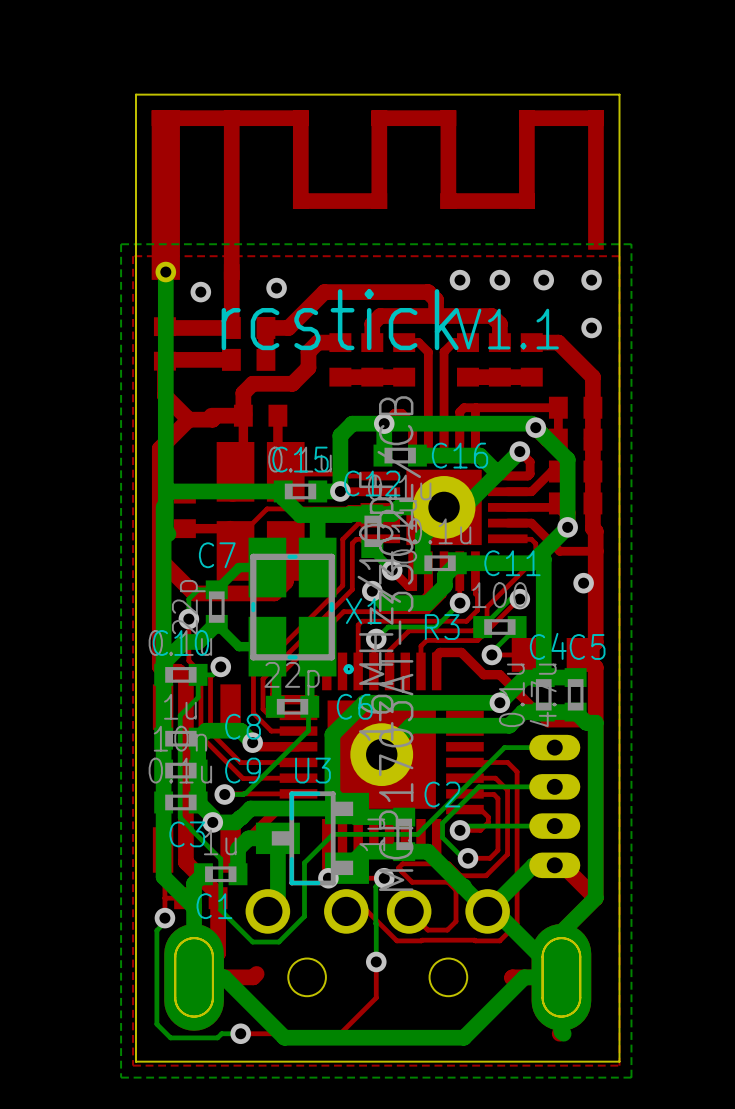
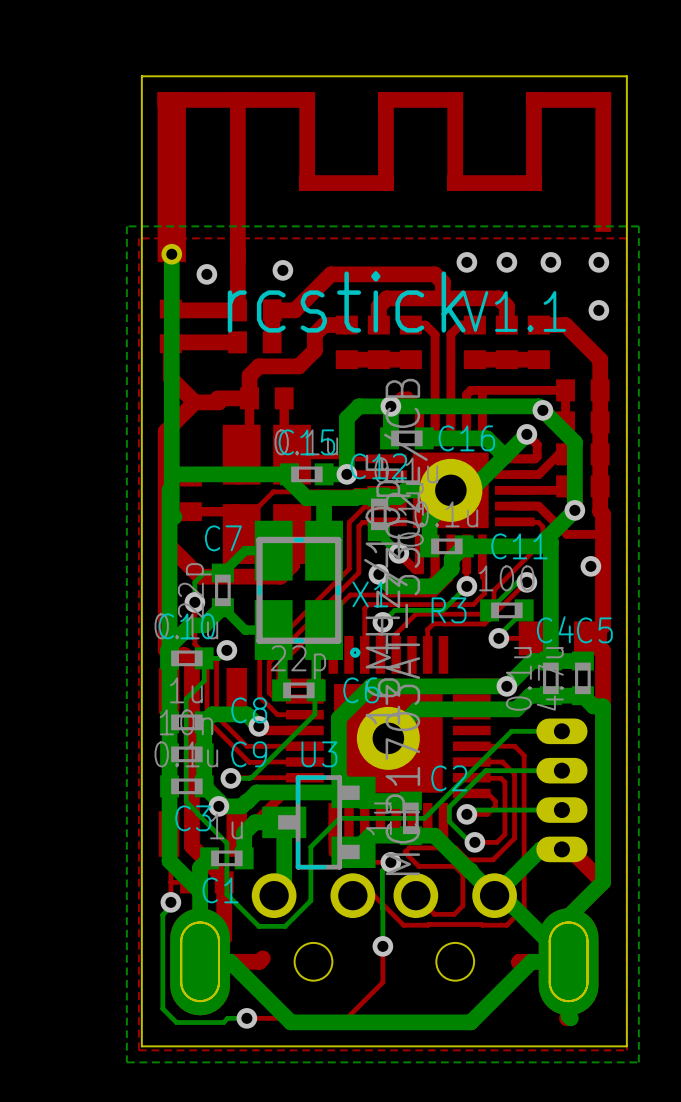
top track: (436, 671) (436, 655) (440, 652) (461, 652) (483, 674) (499, 674) (547, 722) (595, 722) -> none
via: (328, 878) -> none

